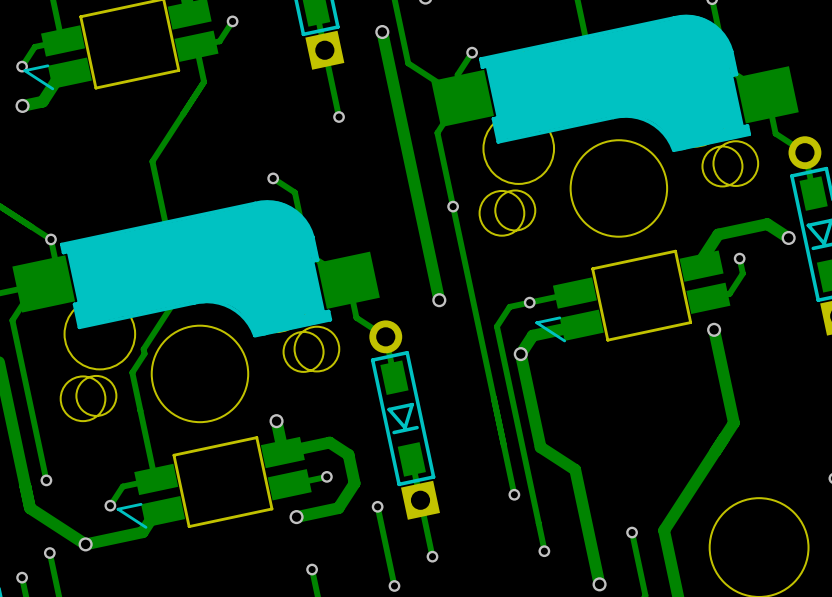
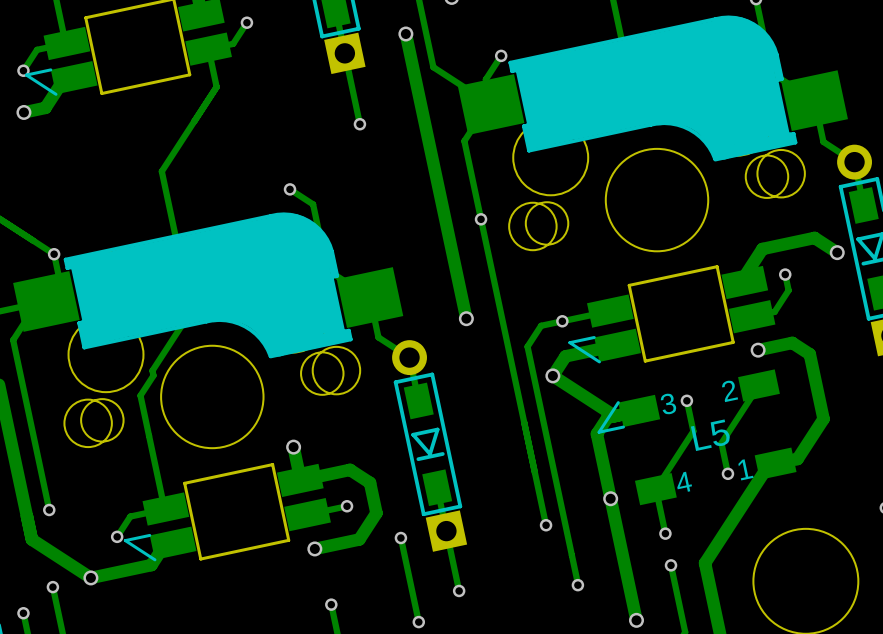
track: (714, 329) (733, 422) (724, 438) -> (758, 350) (792, 342) (809, 354) (823, 419) (797, 459) (768, 465)
track: (532, 335) (520, 354) (540, 447) (575, 469) -> (565, 356) (552, 375) (614, 416)
track: none -> (758, 385) (721, 443) (727, 473)
track: none -> (686, 400) (693, 431) (655, 489)
via: none -> (686, 400)
track: none -> (639, 410) (607, 417) (596, 433) (610, 498)
part: none -> (697, 437)
via: none -> (727, 473)
track: none -> (655, 489) (665, 533)
via: none -> (610, 498)
via: none -> (665, 533)

